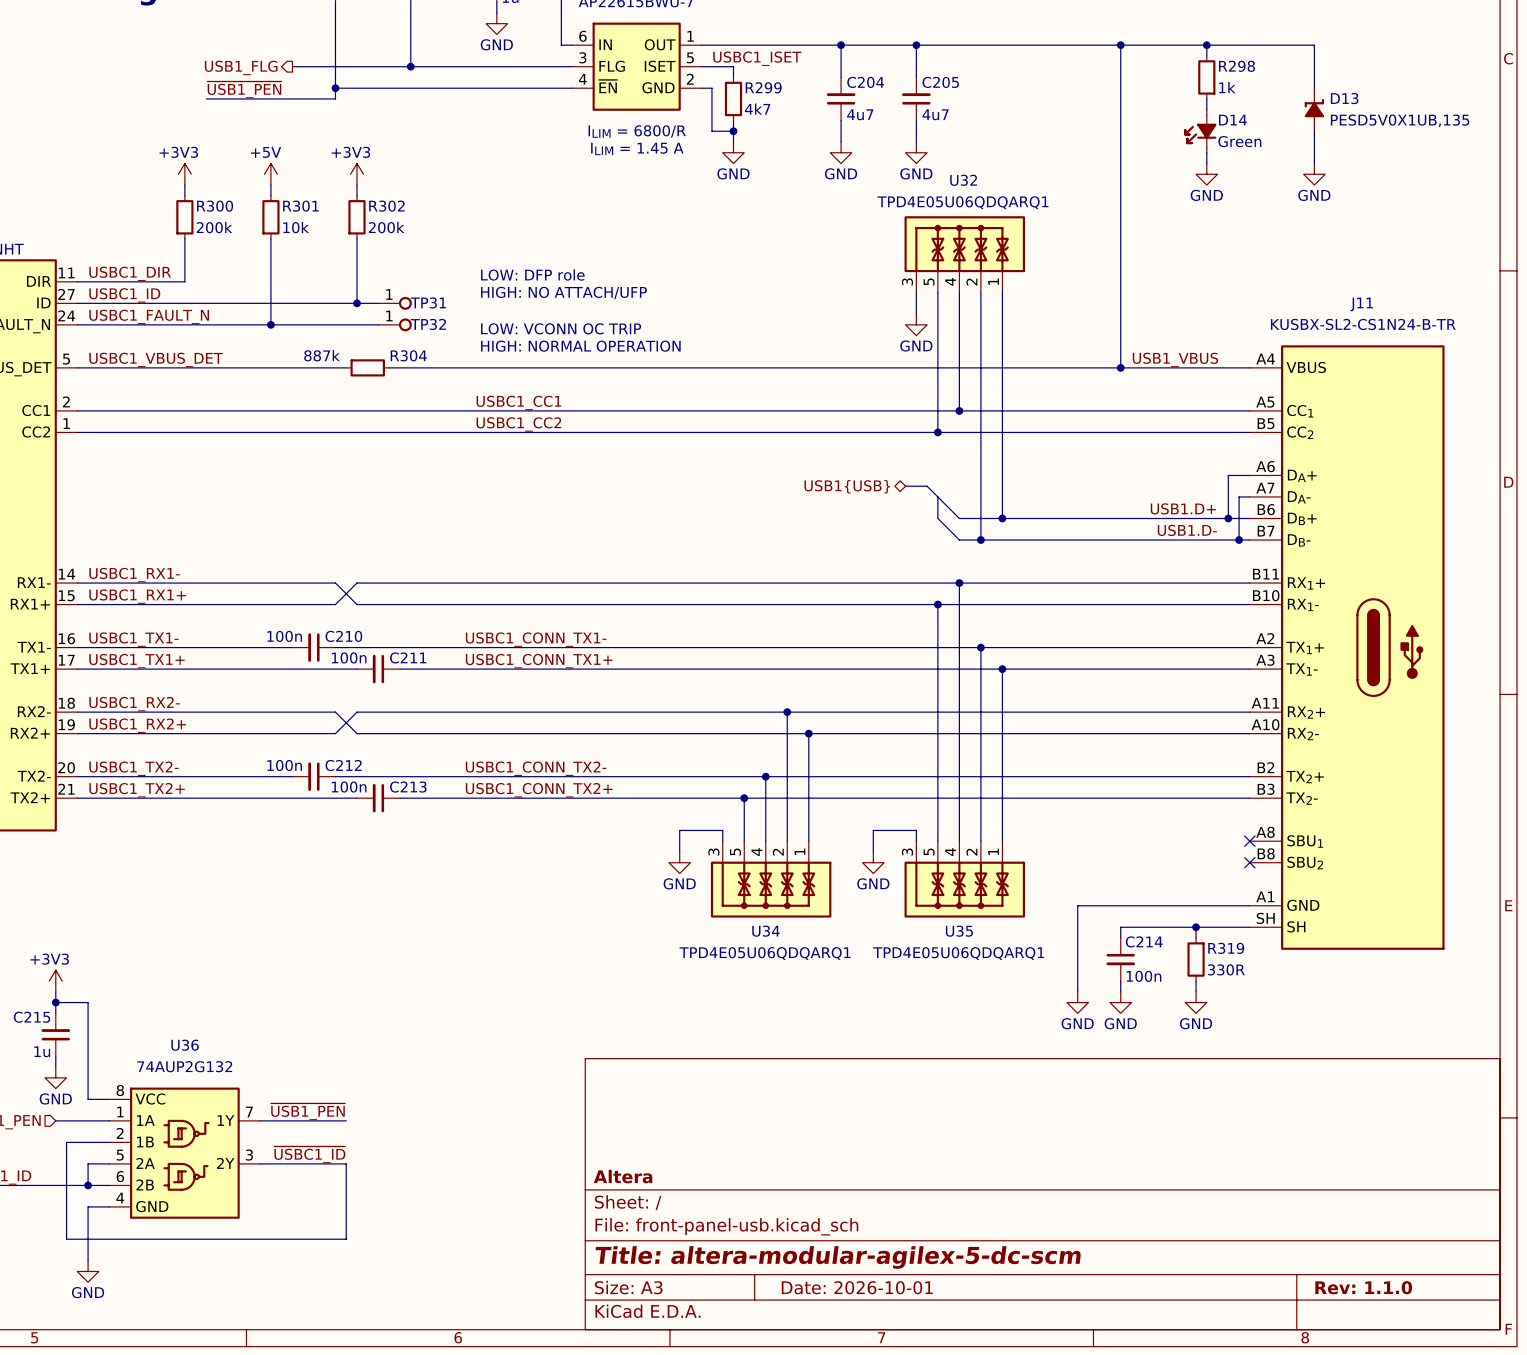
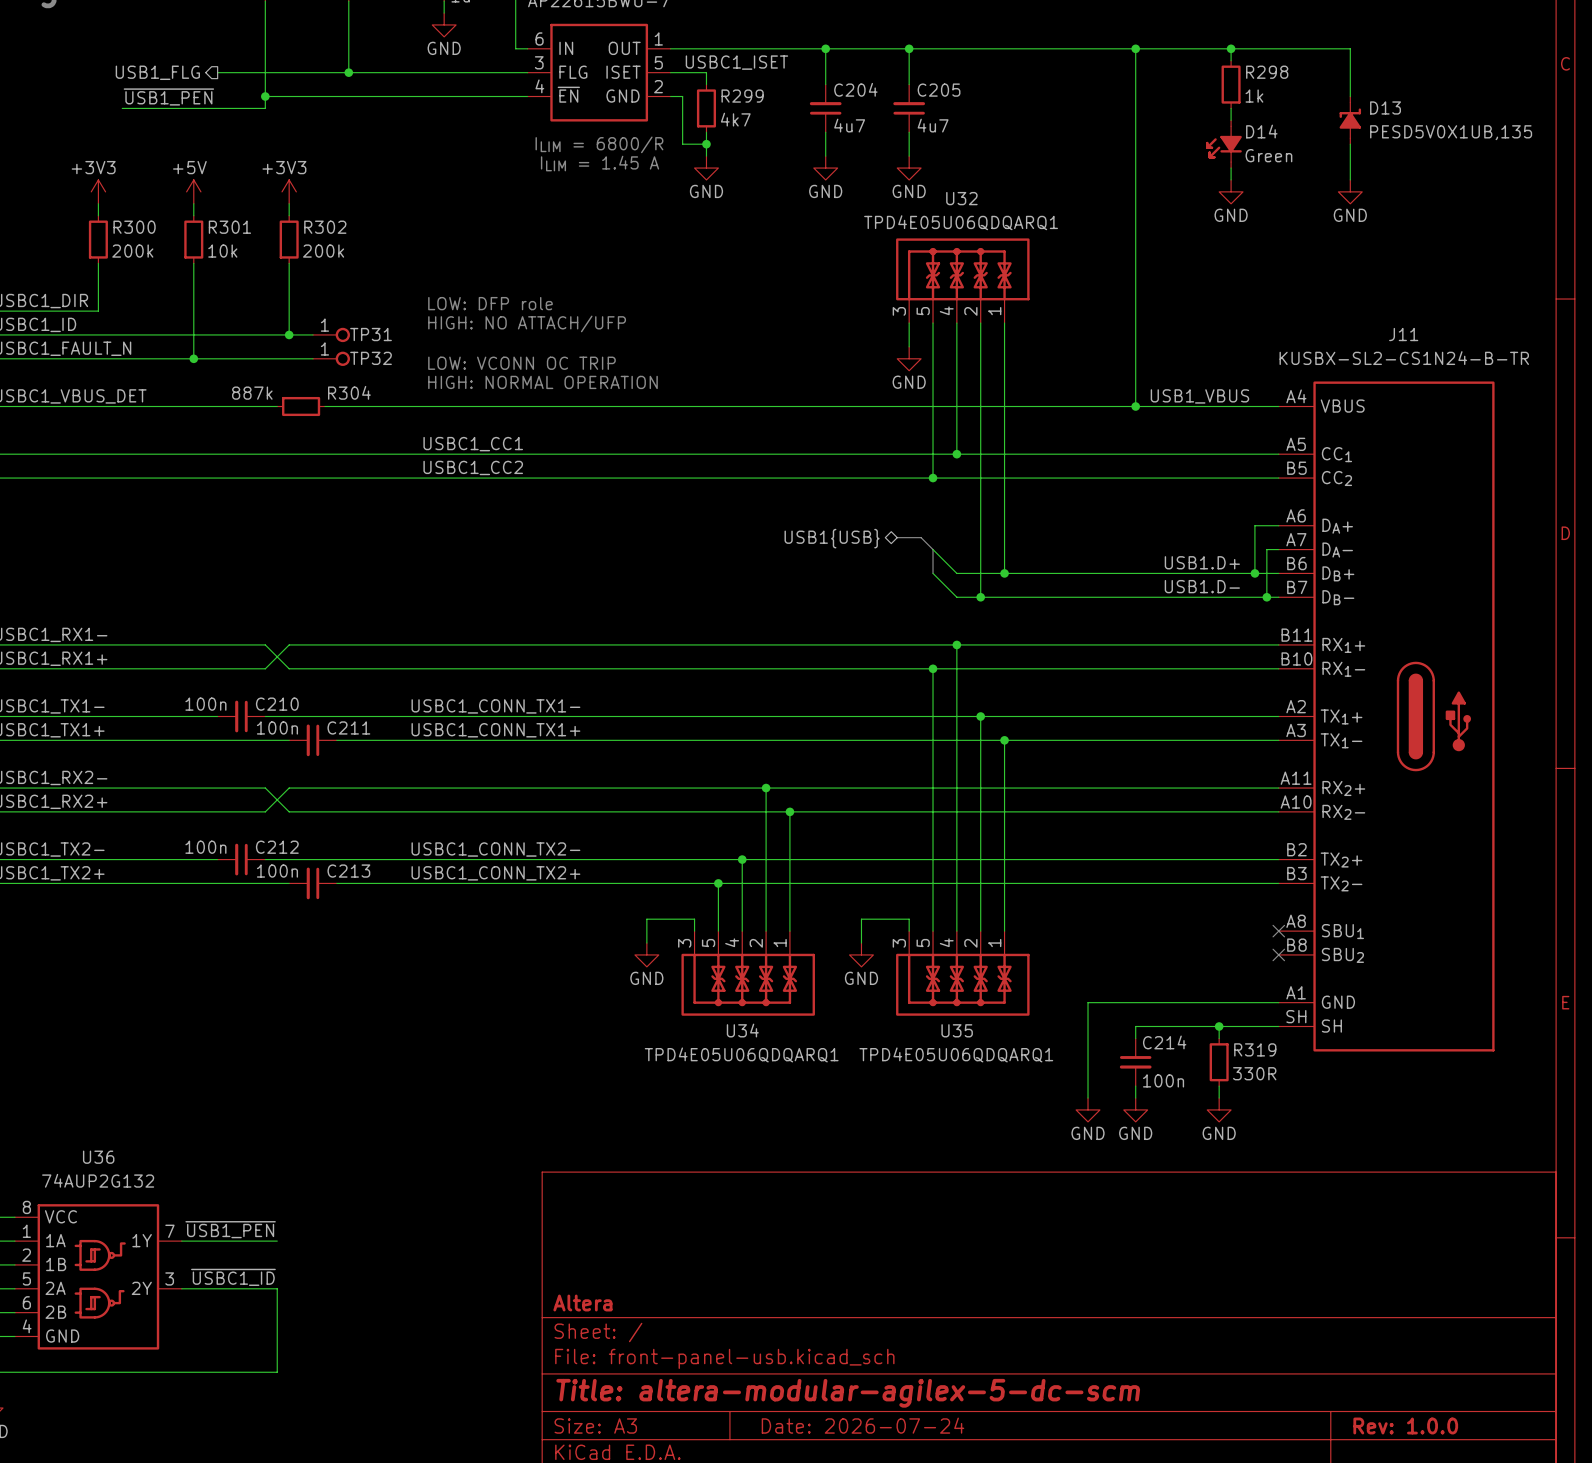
title block: Date: 2026-10-01 (857, 1287) -> Date: 2026-07-24 (862, 1425)
title block: Rev: 1.1.0 (1363, 1287) -> Rev: 1.0.0 (1405, 1425)

